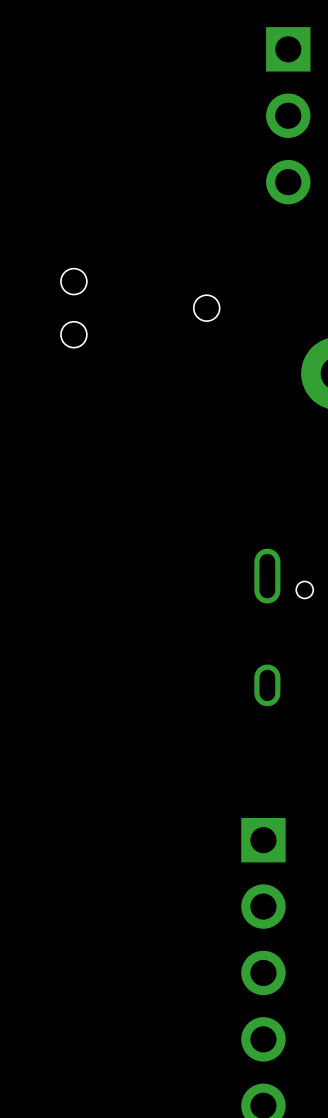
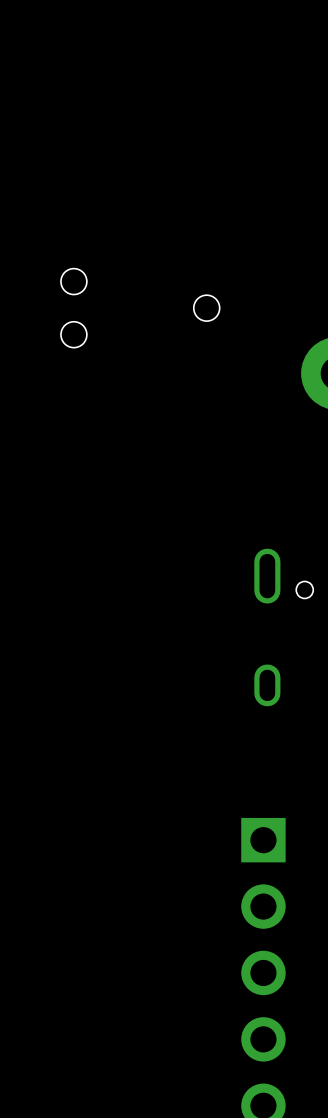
part: (288, 115) -> none

